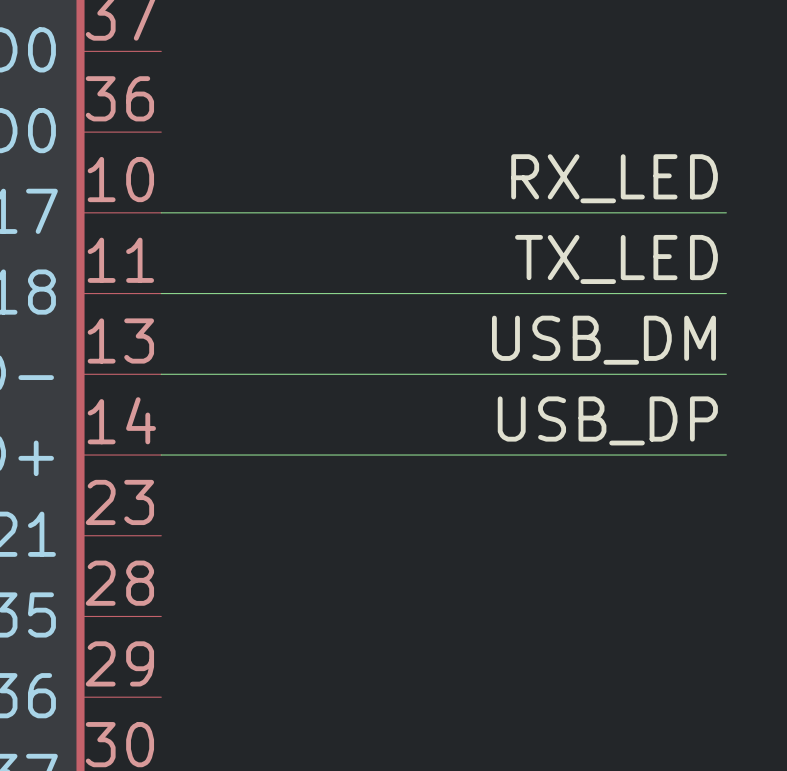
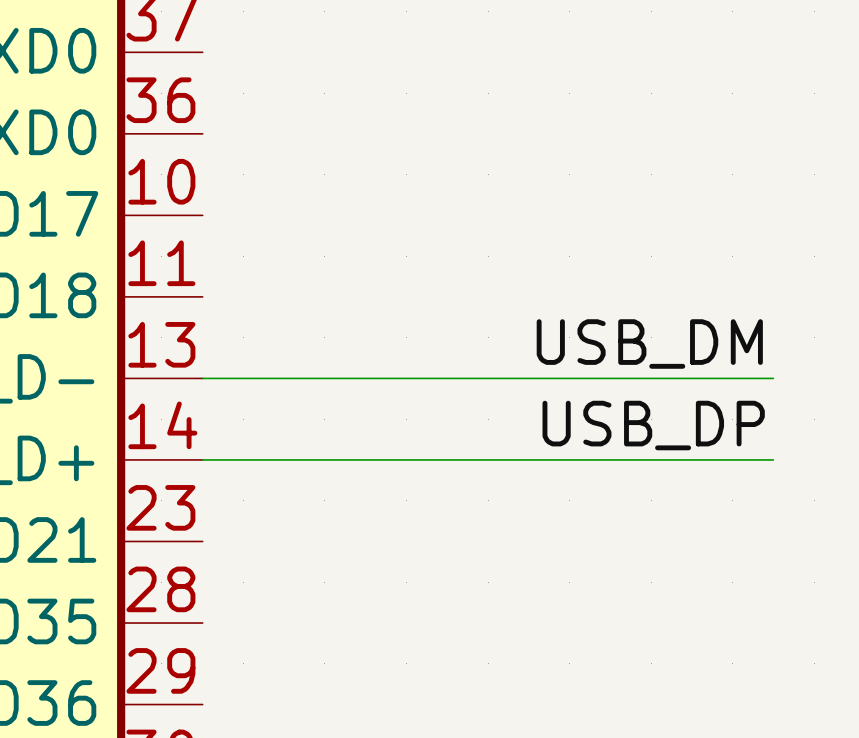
label: RX_LED (614, 178) -> none
wire: (161, 212) (726, 212) -> none
label: TX_LED (616, 259) -> none
wire: (161, 293) (726, 293) -> none

